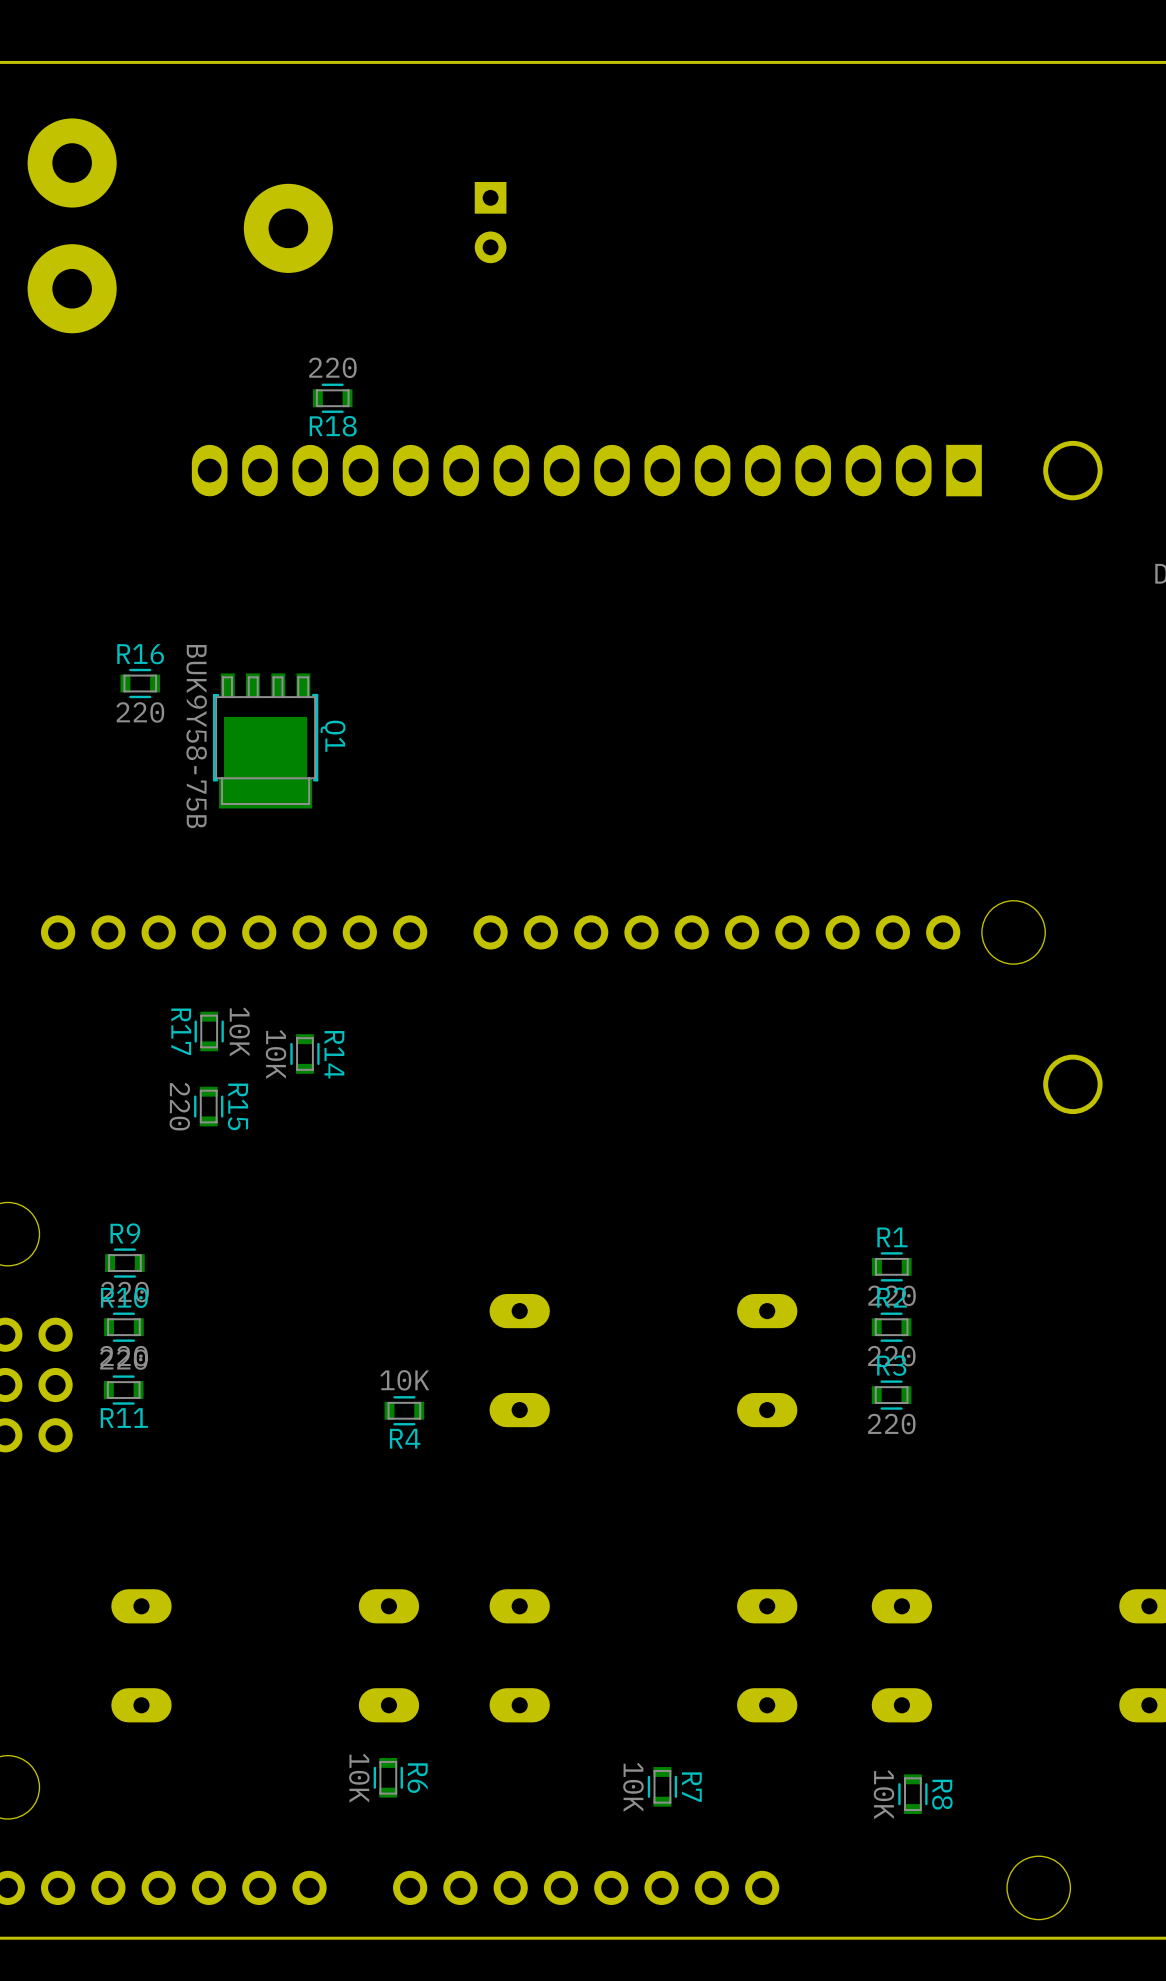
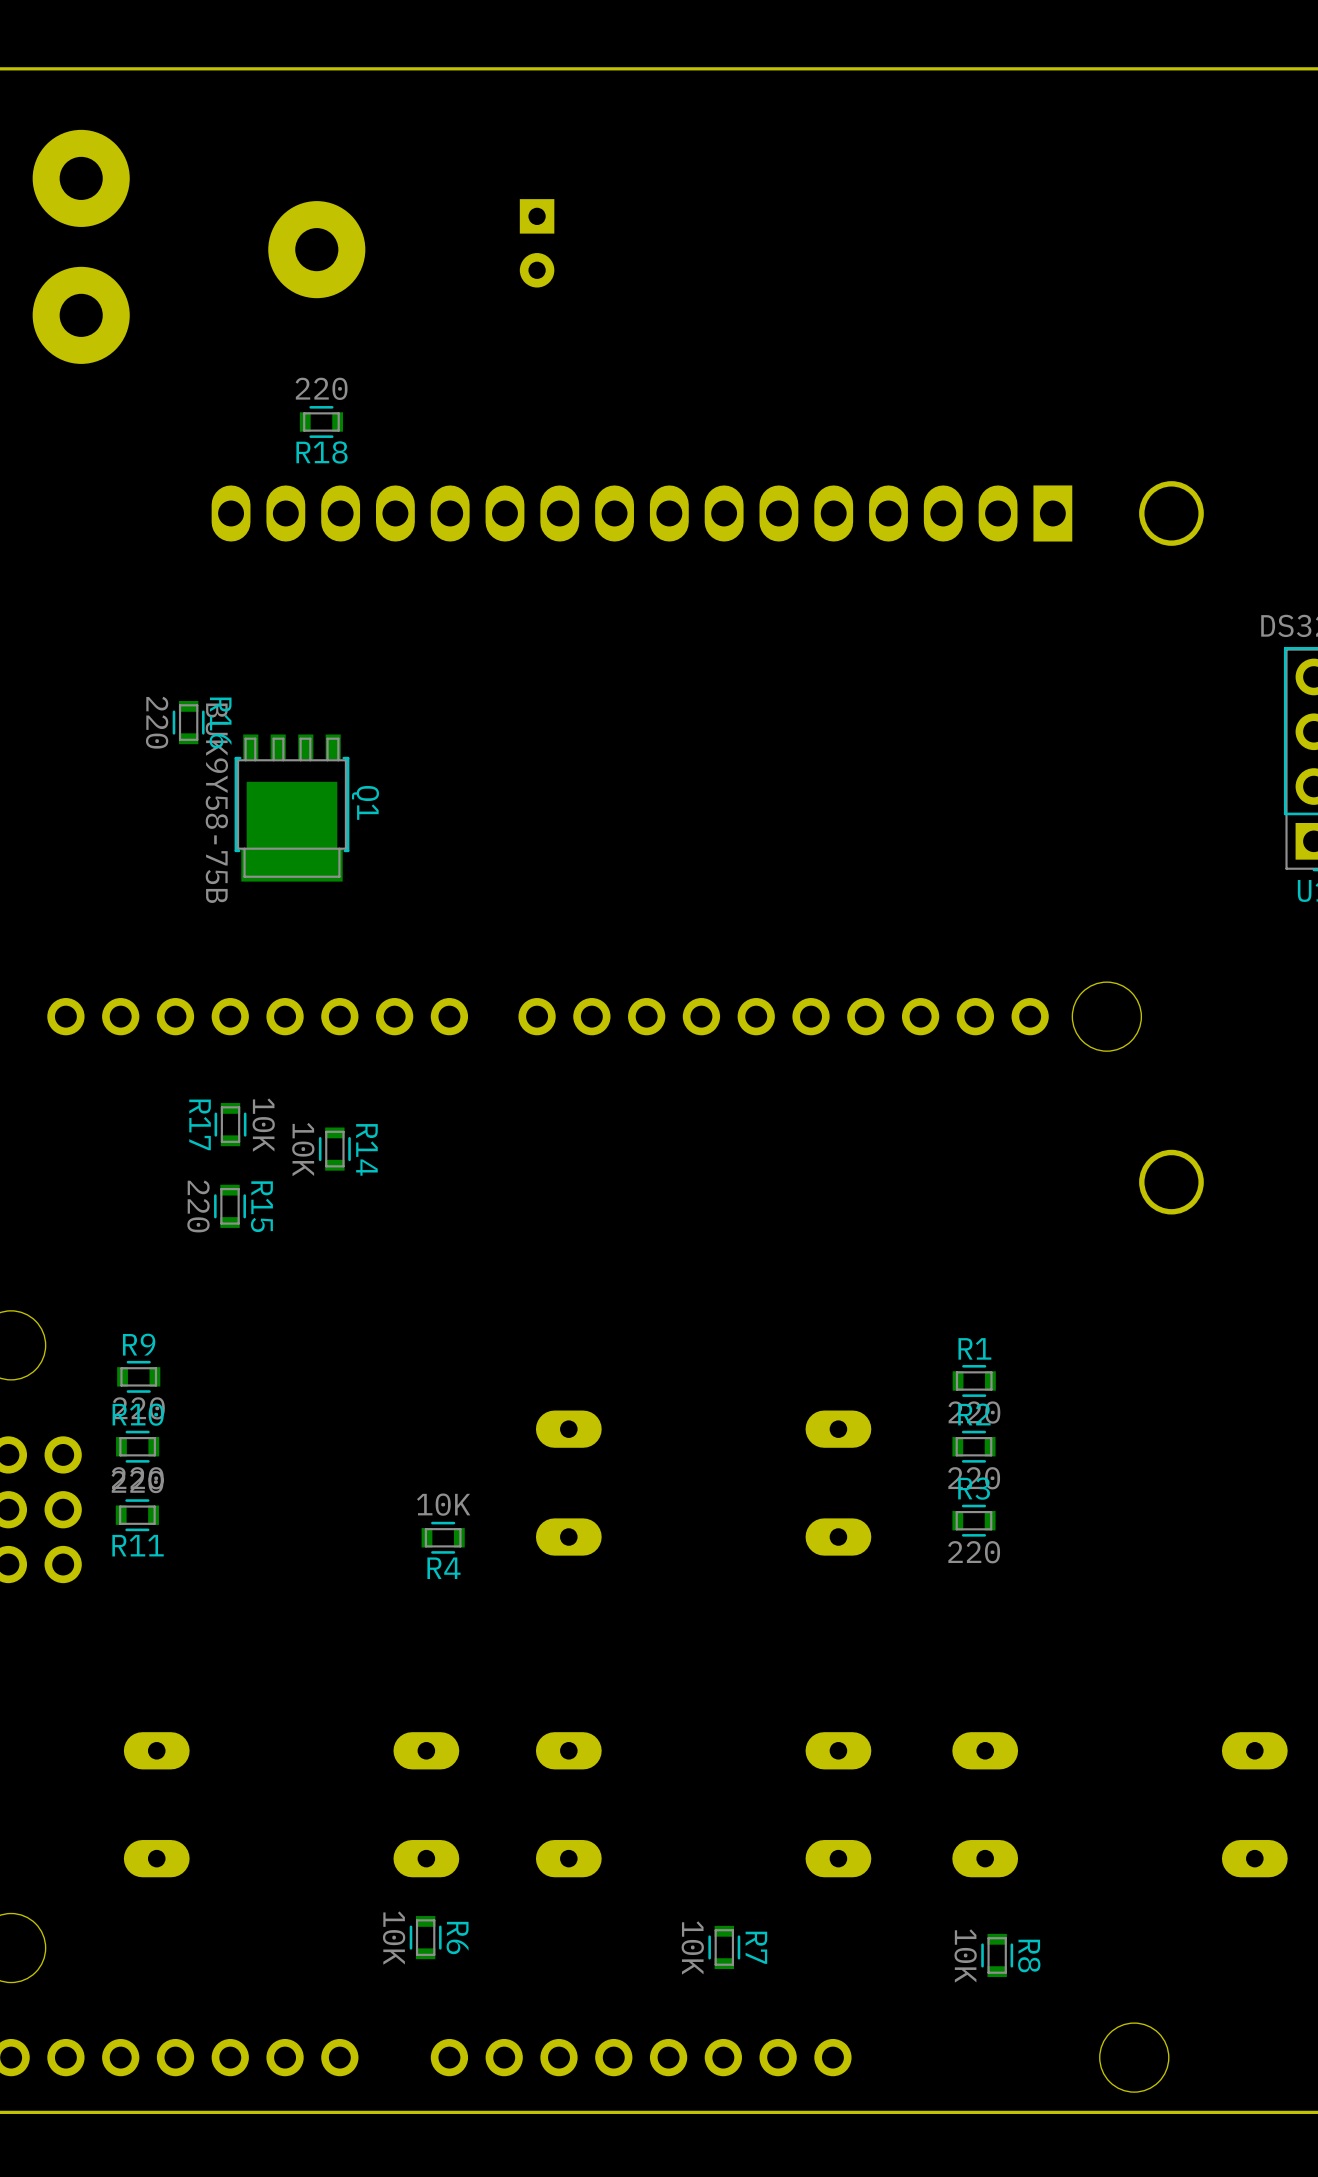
R18 position: (332, 398) -> (321, 421)
R16 rotation: 0° (140, 683) -> 90° clockwise (188, 722)
R16 position: (140, 683) -> (188, 722)

